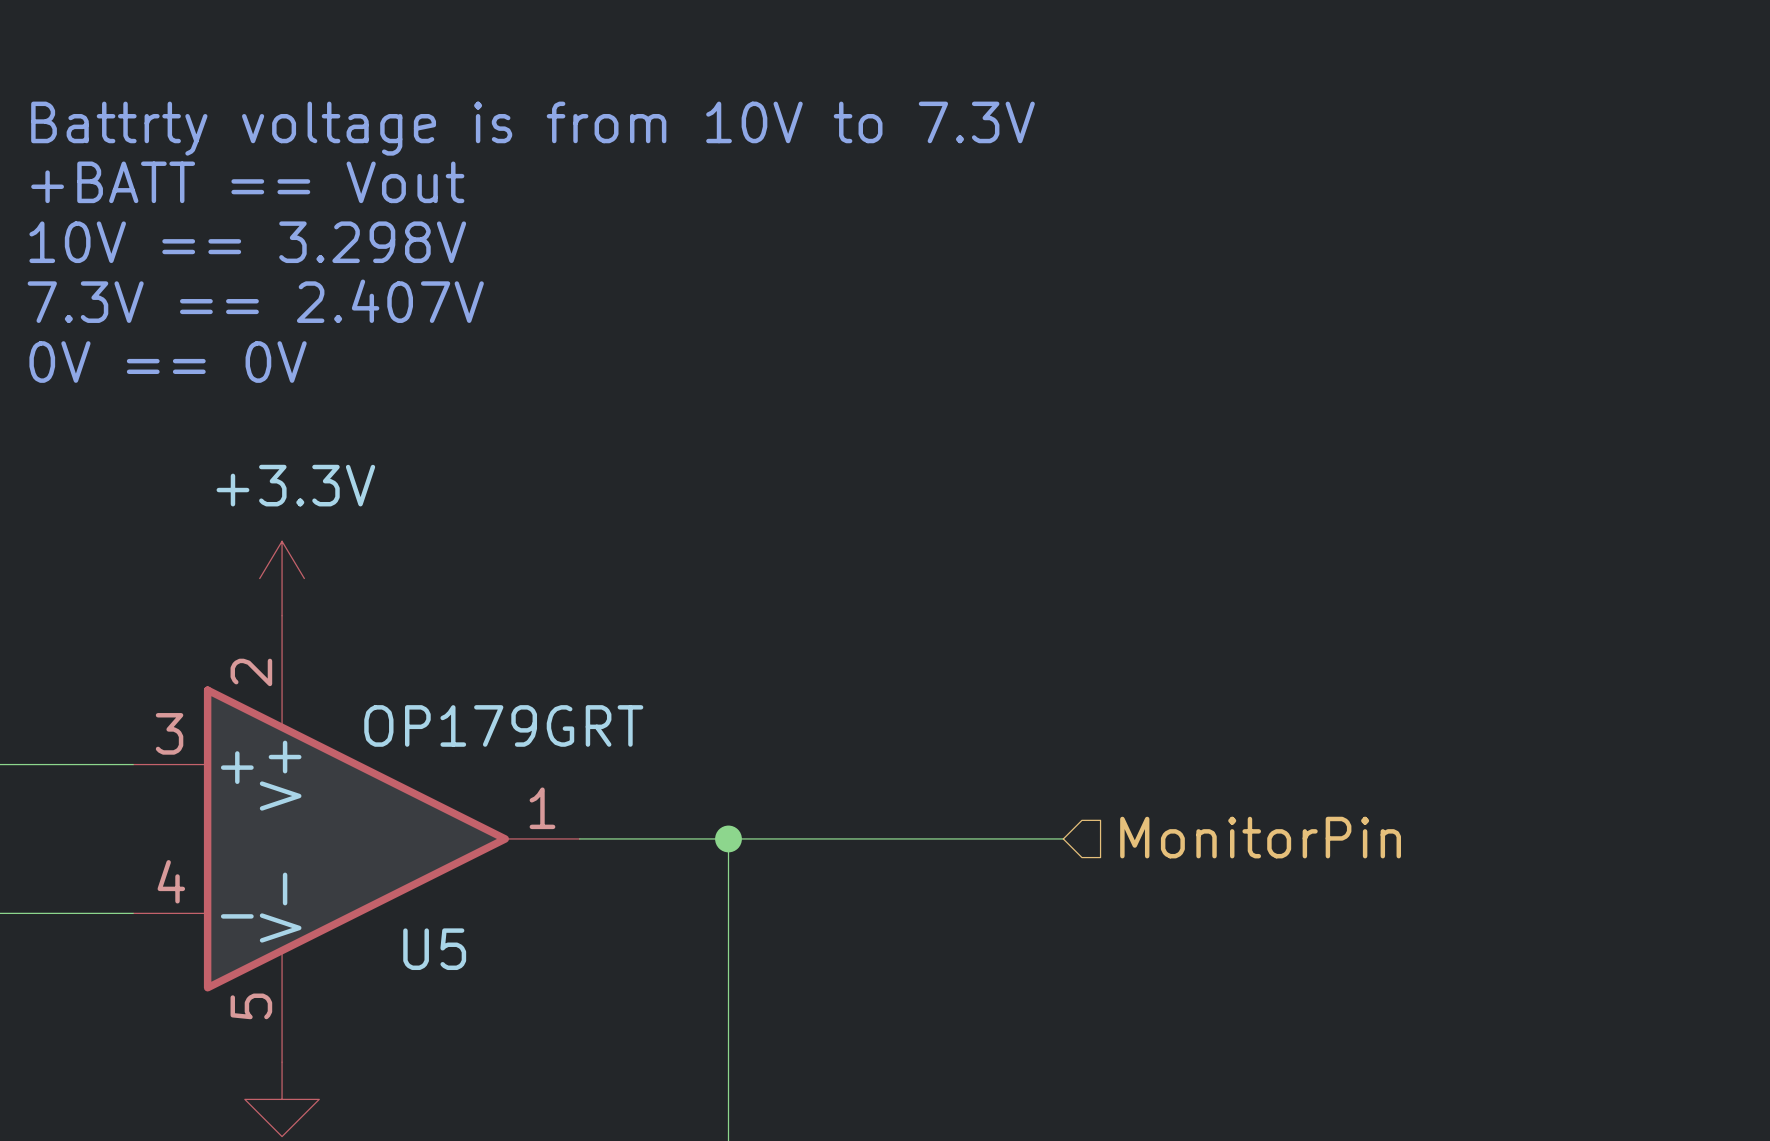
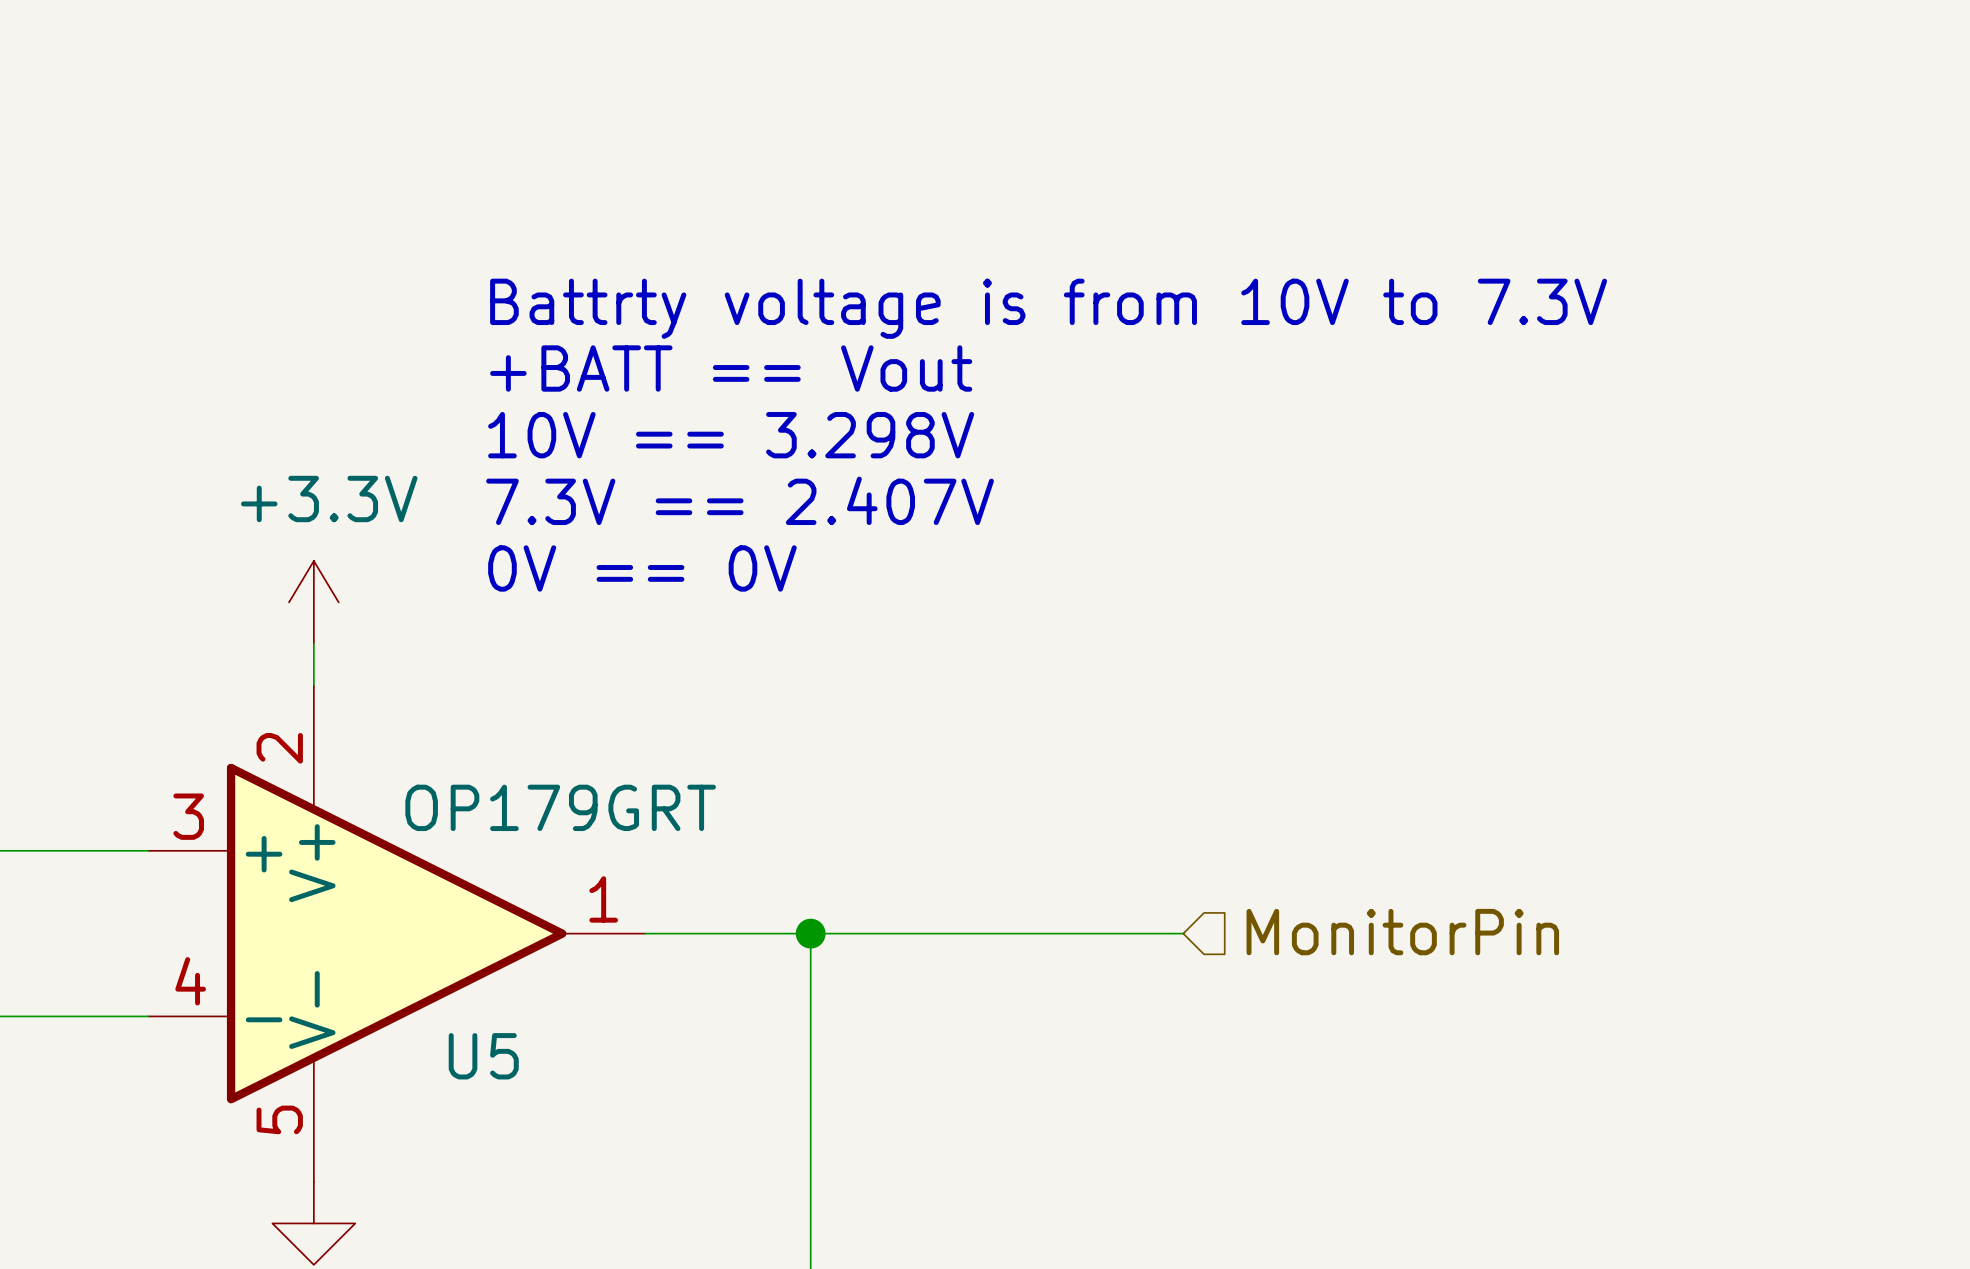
text position: Battrty voltage is from 10V to 7.3V (533, 128) -> Battrty voltage is from 10V to 7.3V (1048, 308)
text position: +BATT == Vout (247, 182) -> +BATT == Vout (731, 368)
text position: 10V == 3.298V (247, 242) -> 10V == 3.298V (731, 435)
text position: 7.3V == 2.407V (255, 301) -> 7.3V == 2.407V (740, 500)
text position: 0V == 0V (168, 362) -> 0V == 0V (642, 568)
power symbol position: +3.3V (282, 578) -> +3.3V (313, 602)

